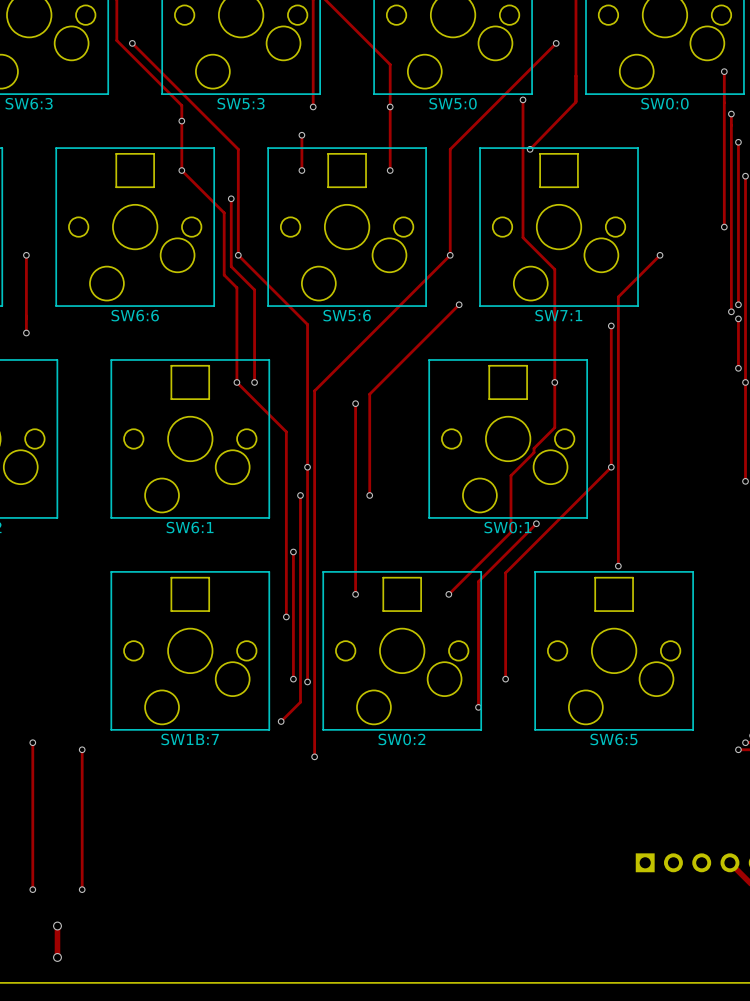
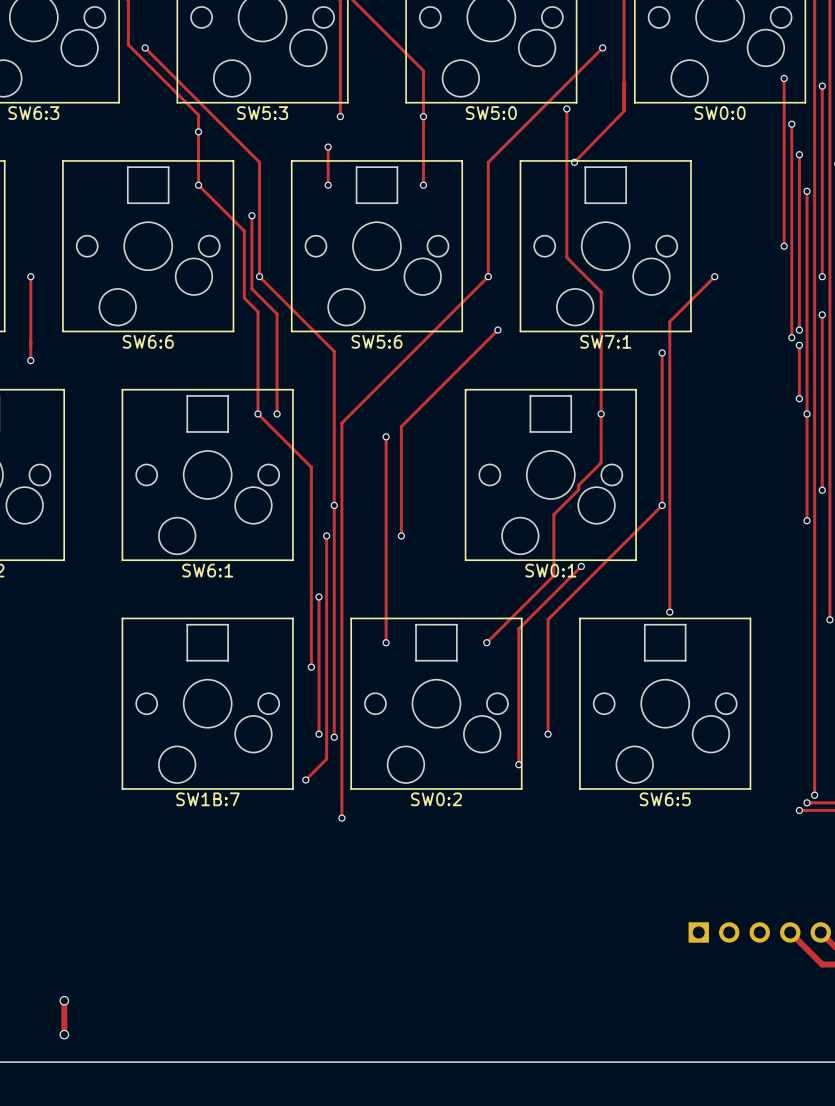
via: (32, 742) -> none
track: (32, 743) (32, 889) -> none
via: (82, 749) -> none
track: (82, 750) (82, 889) -> none
via: (32, 889) -> none
via: (82, 889) -> none

